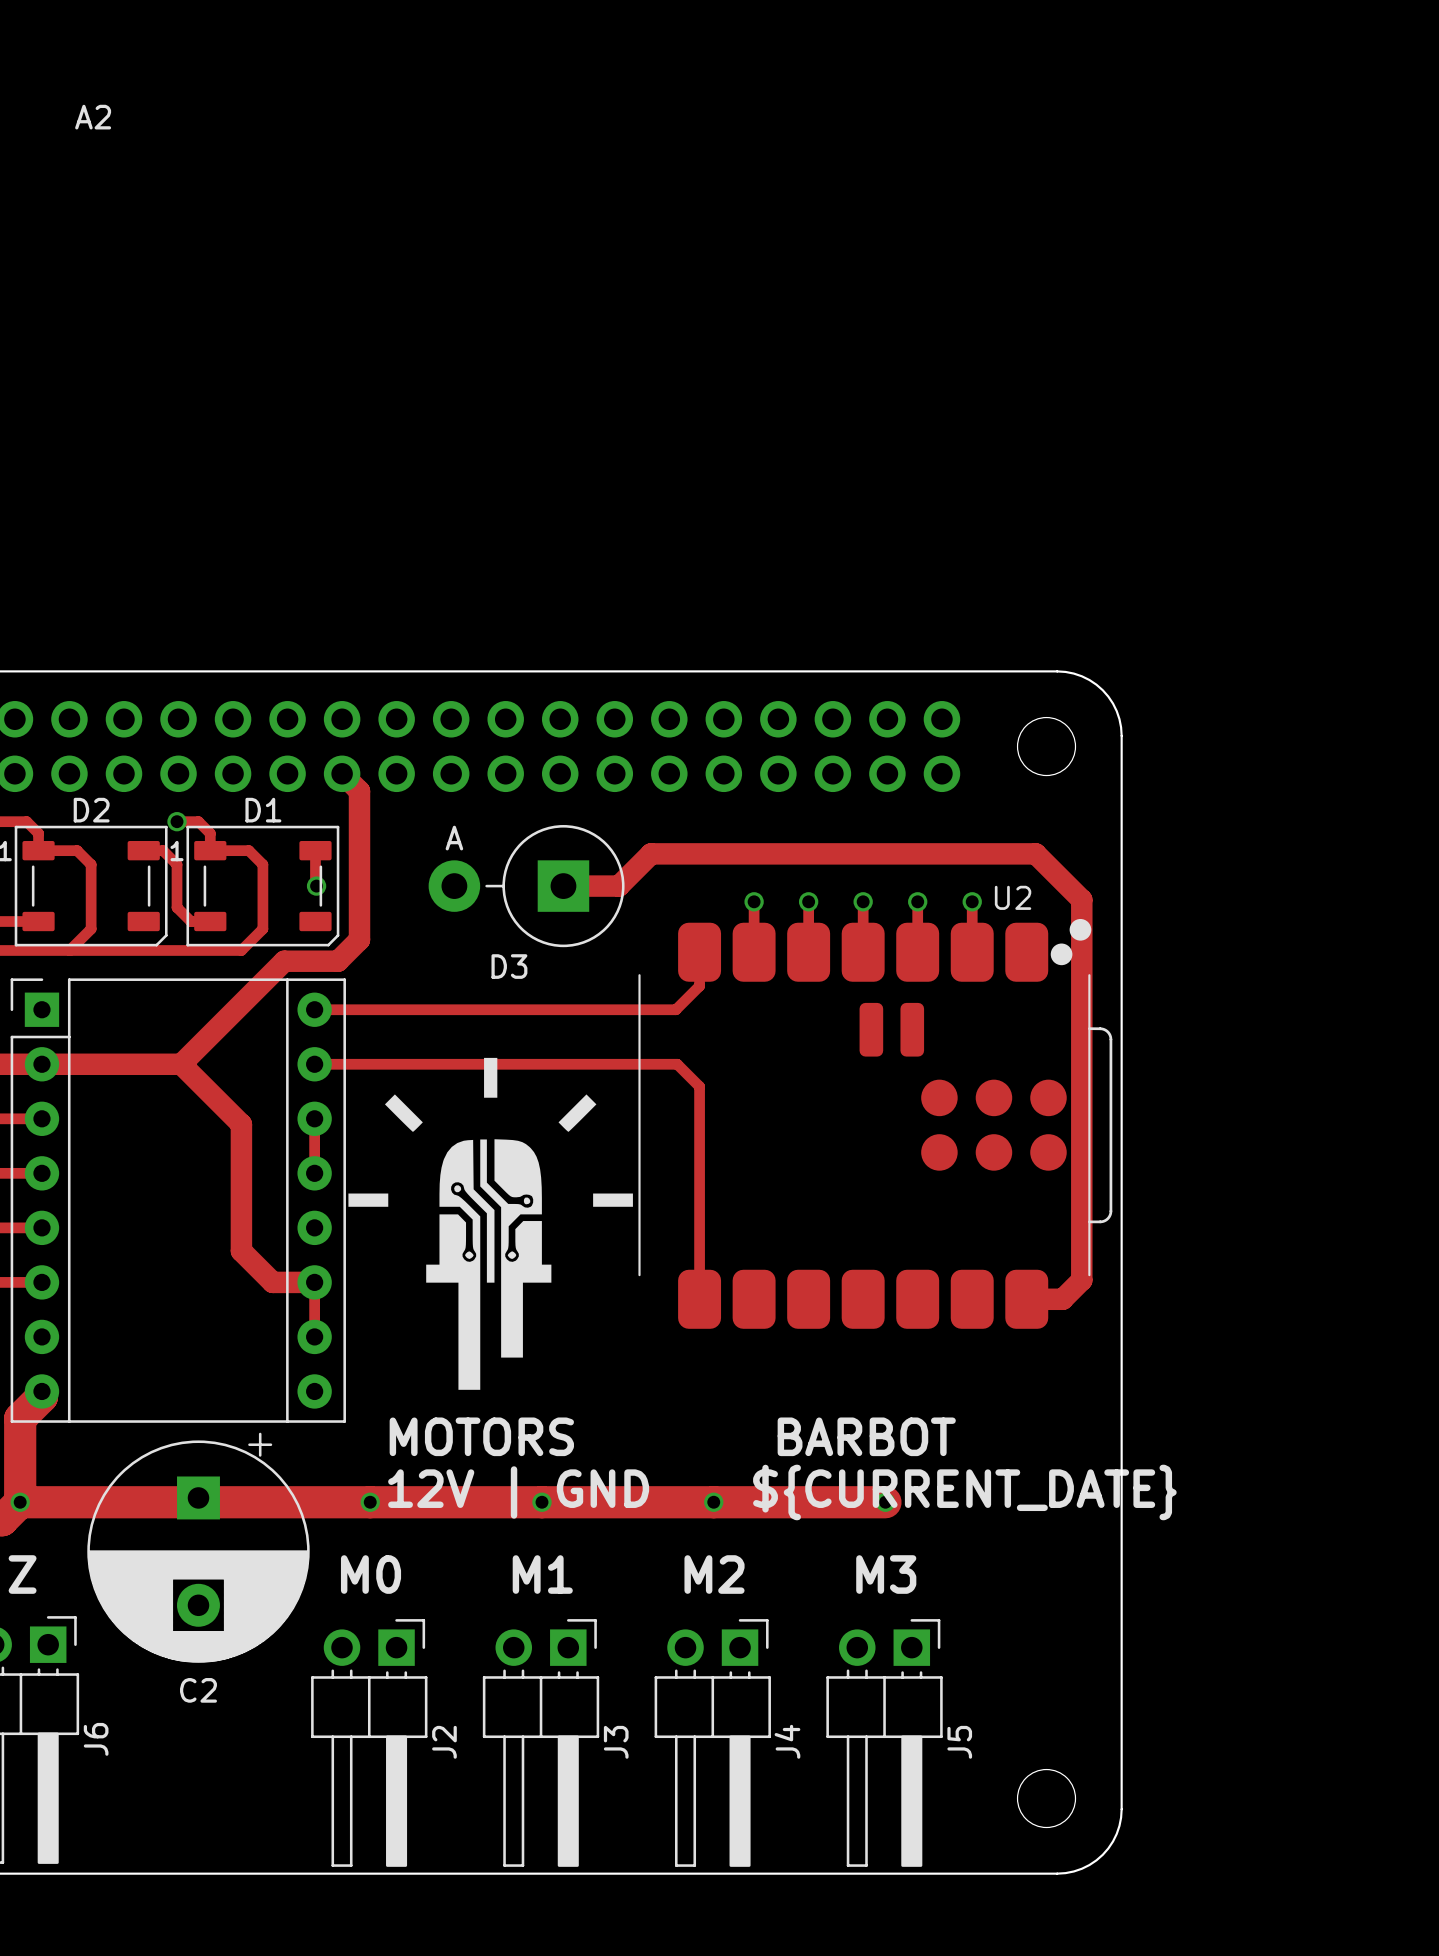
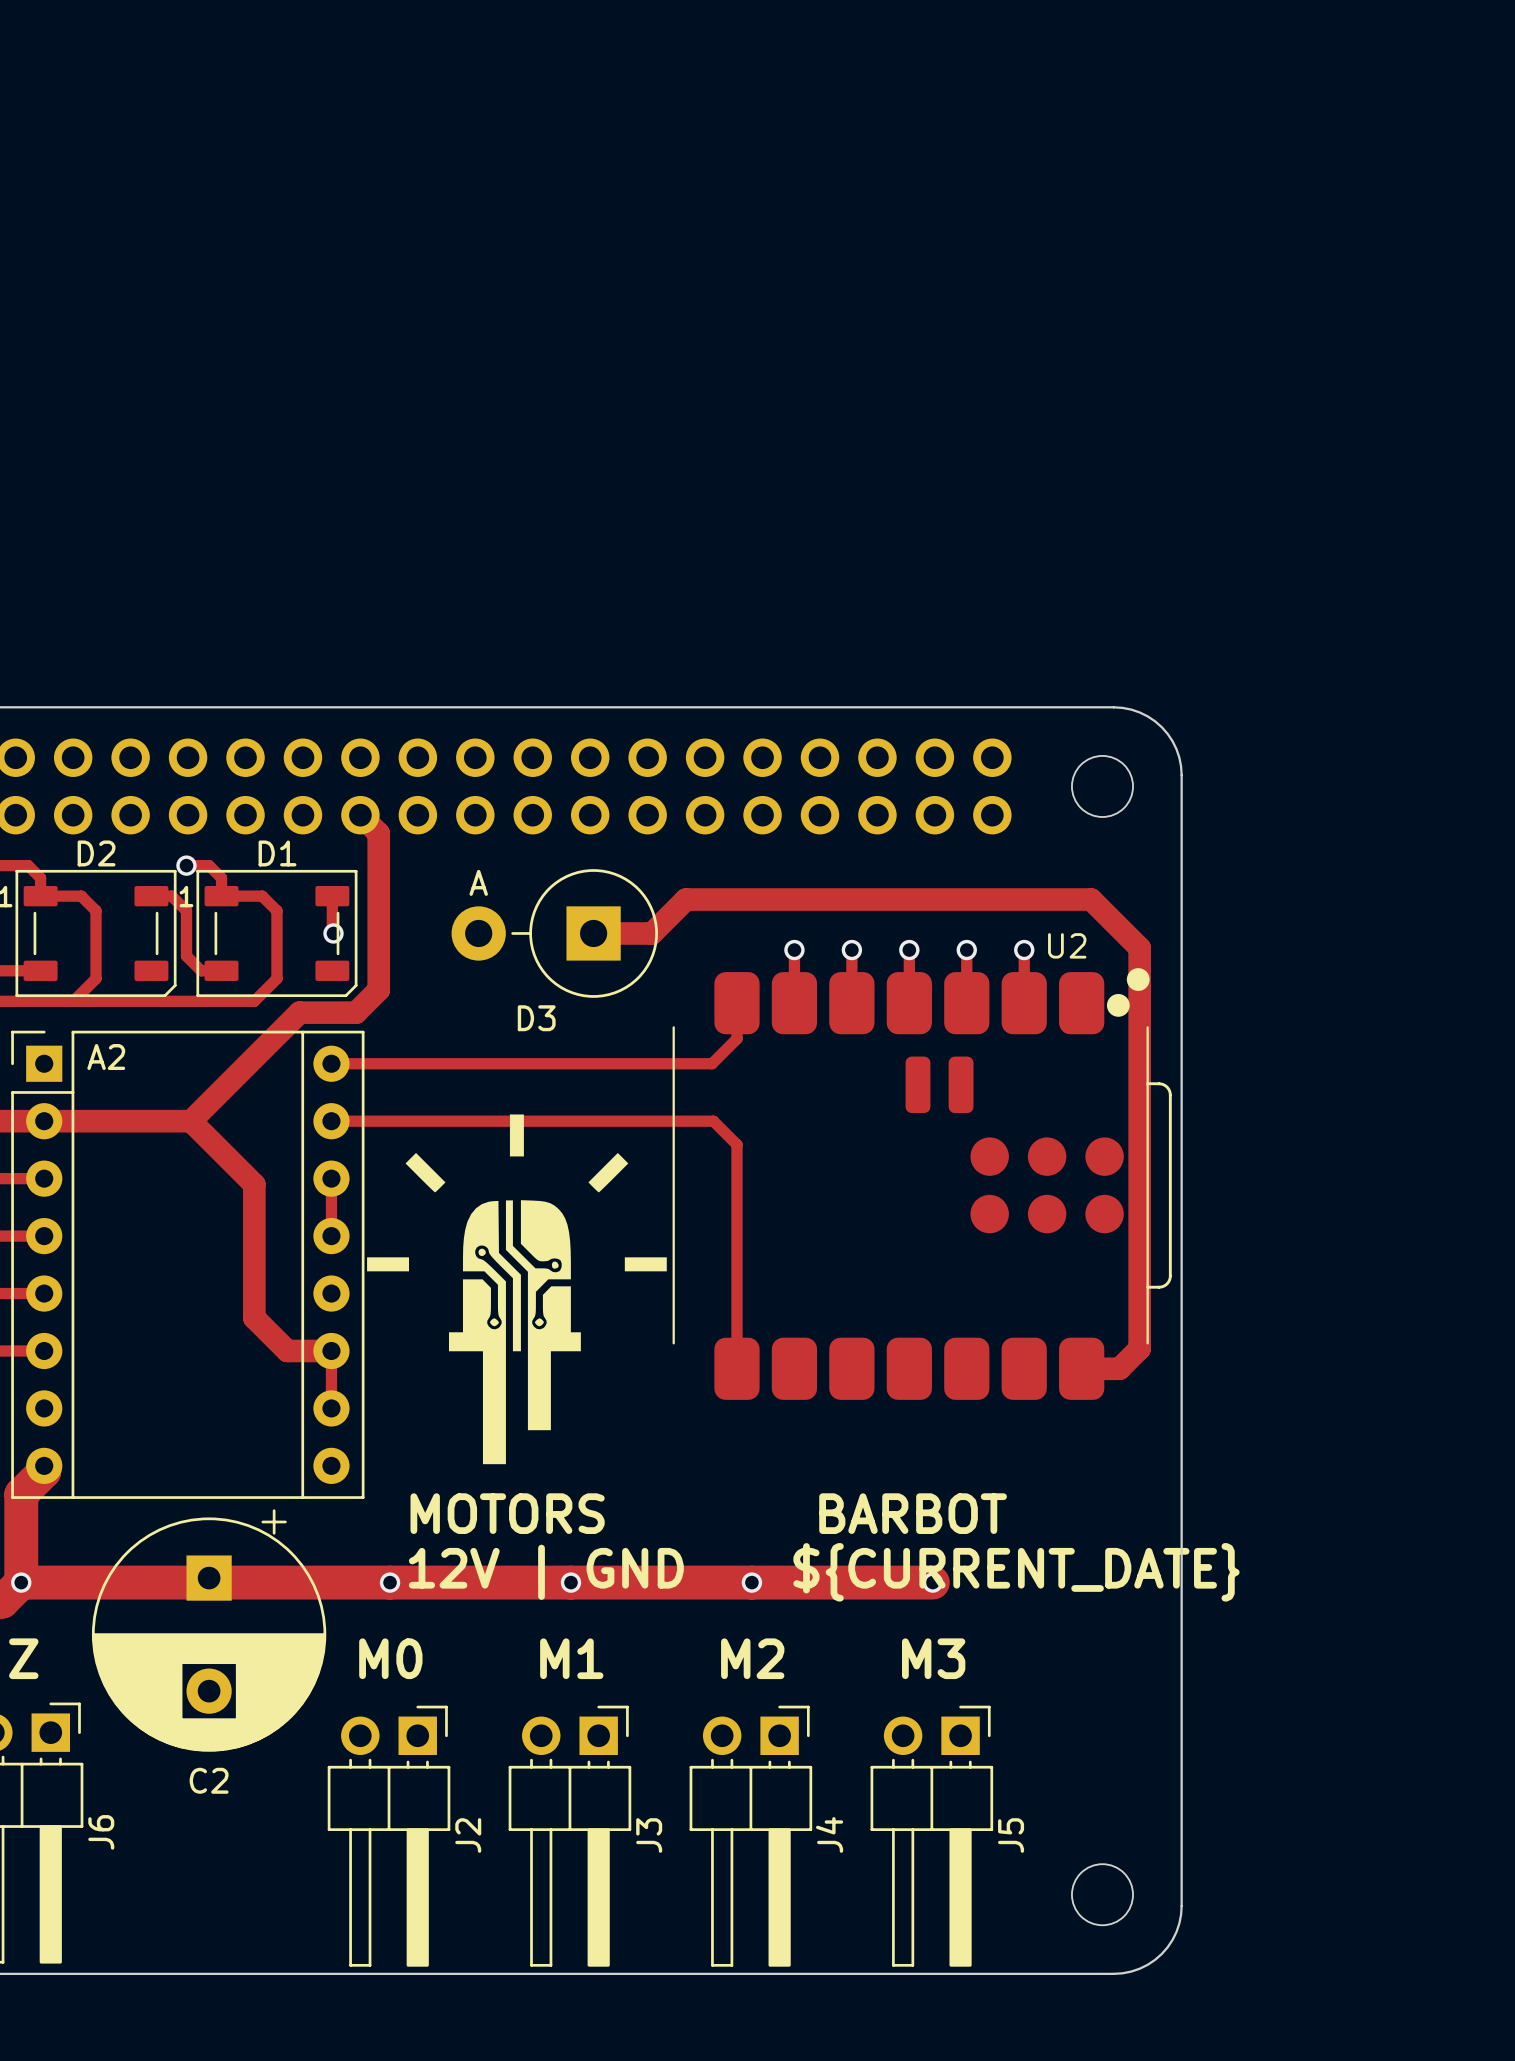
A2 name position: A2 (93, 117) -> A2 (106, 1057)

